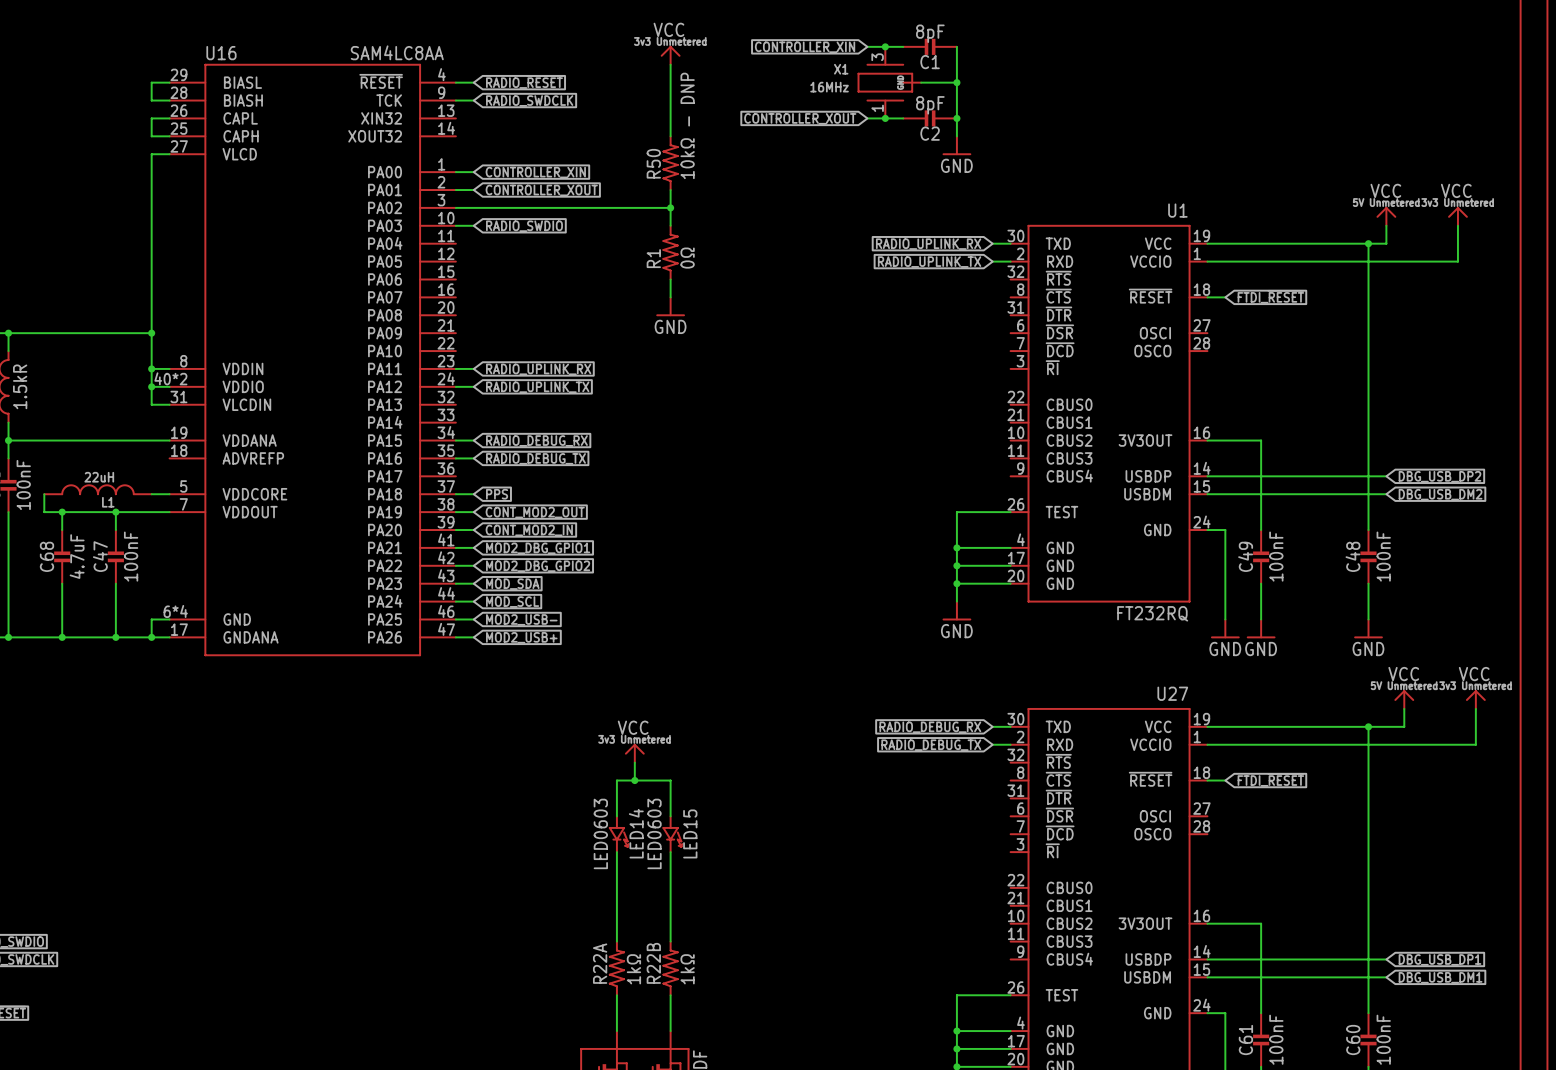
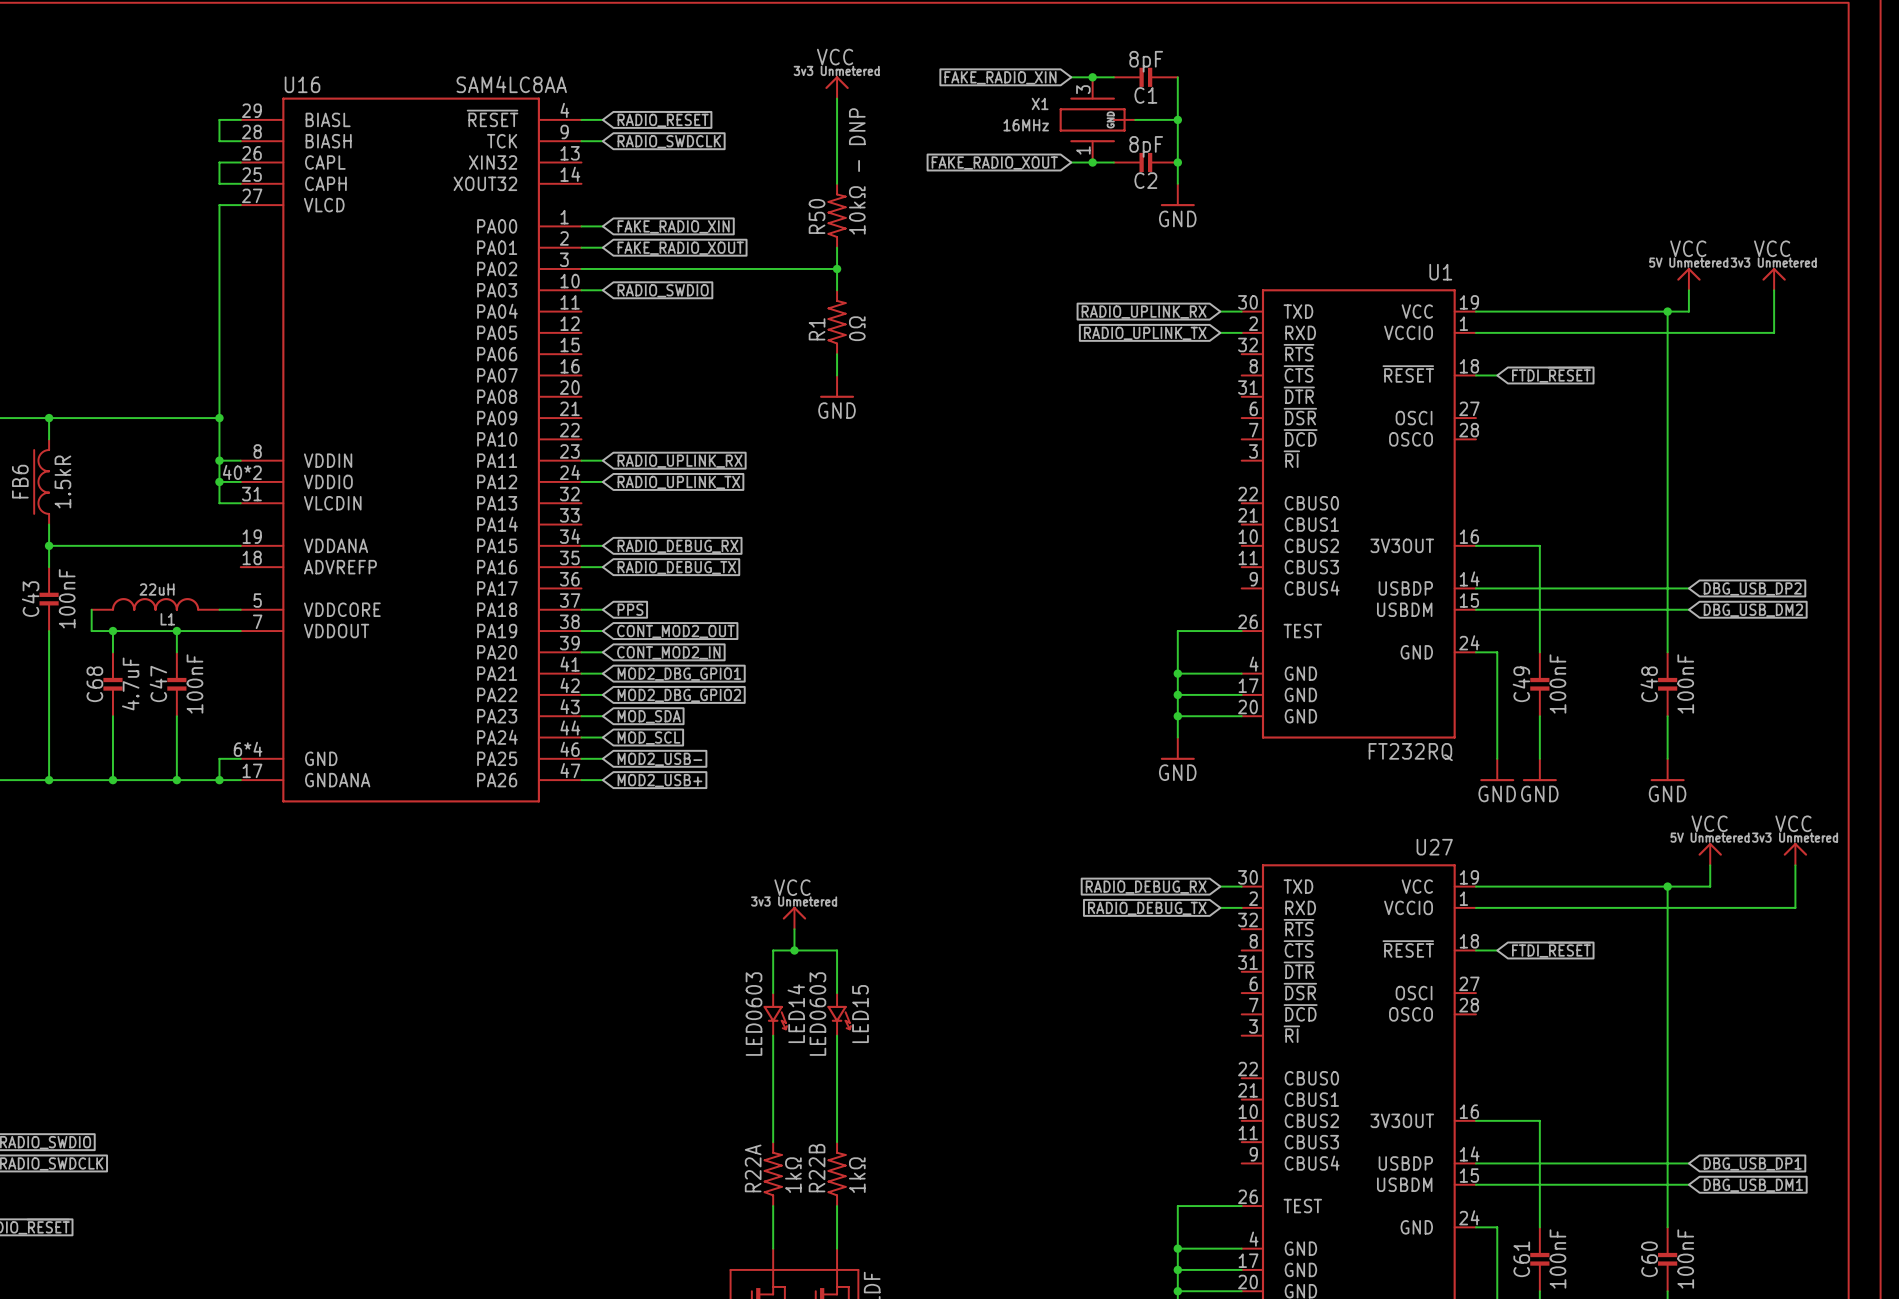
global label: CONTROLLER_XIN (805, 47) -> FAKE_RADIO_XIN (1000, 77)
global label: CONTROLLER_XOUT (800, 118) -> FAKE_RADIO_XOUT (994, 163)
global label: CONTROLLER_XIN (535, 172) -> FAKE_RADIO_XIN (673, 226)
global label: CONTROLLER_XOUT (541, 190) -> FAKE_RADIO_XOUT (680, 248)

